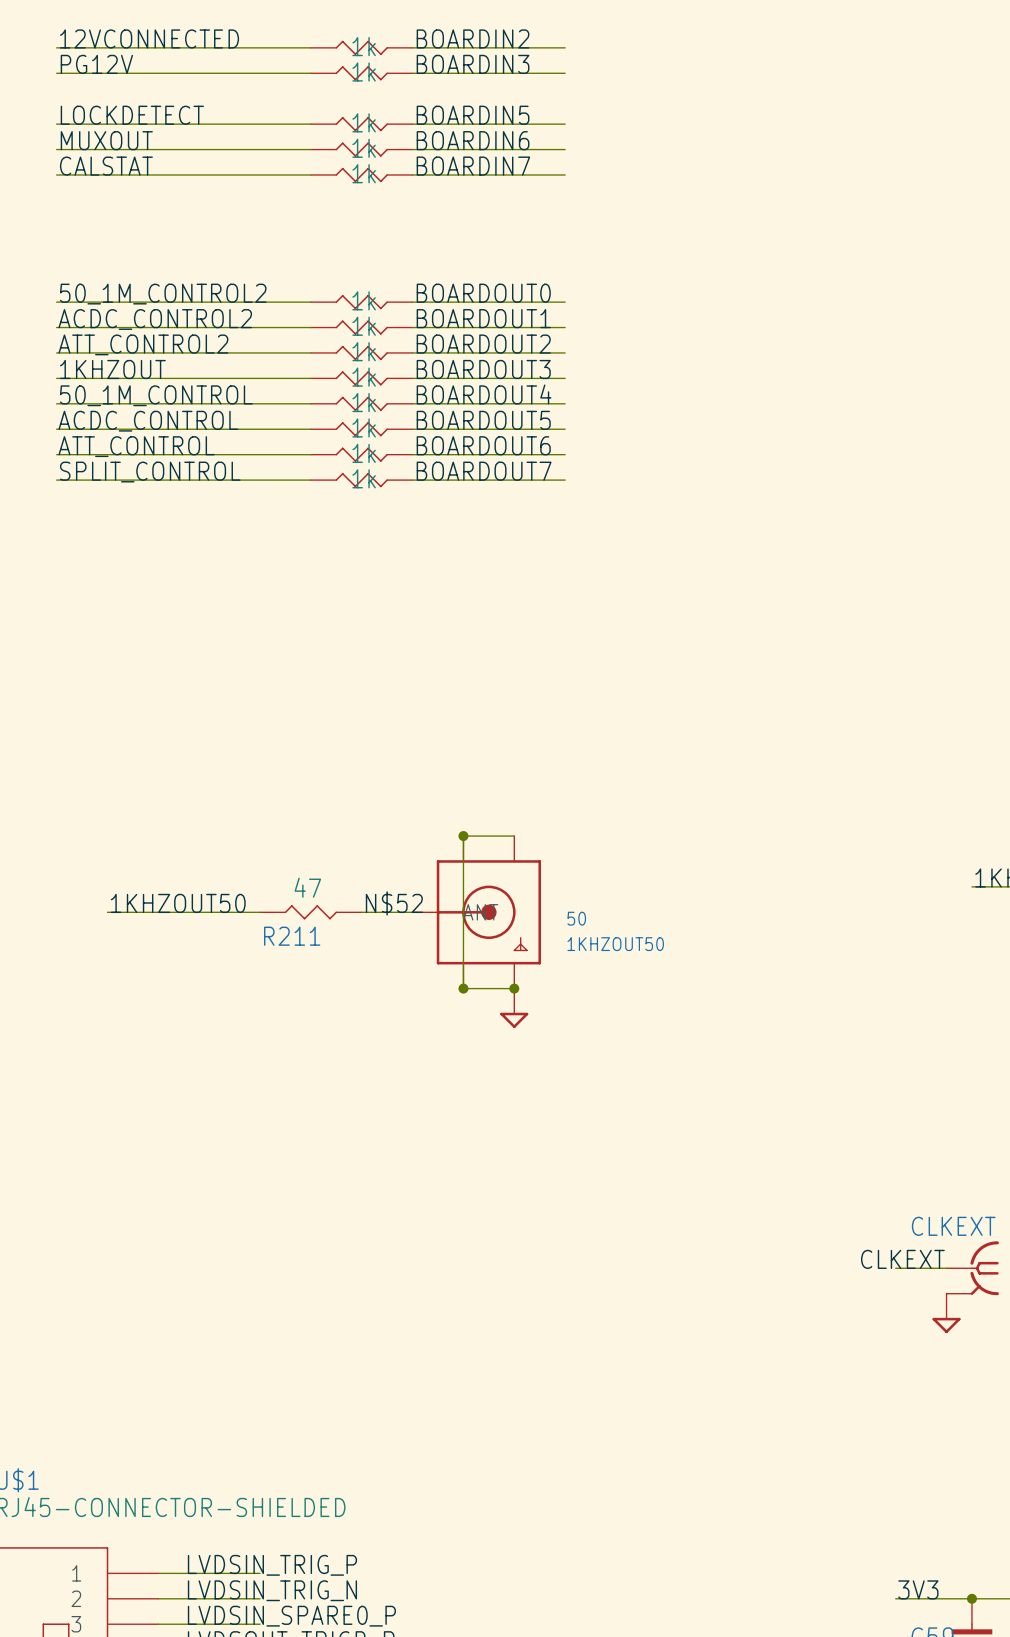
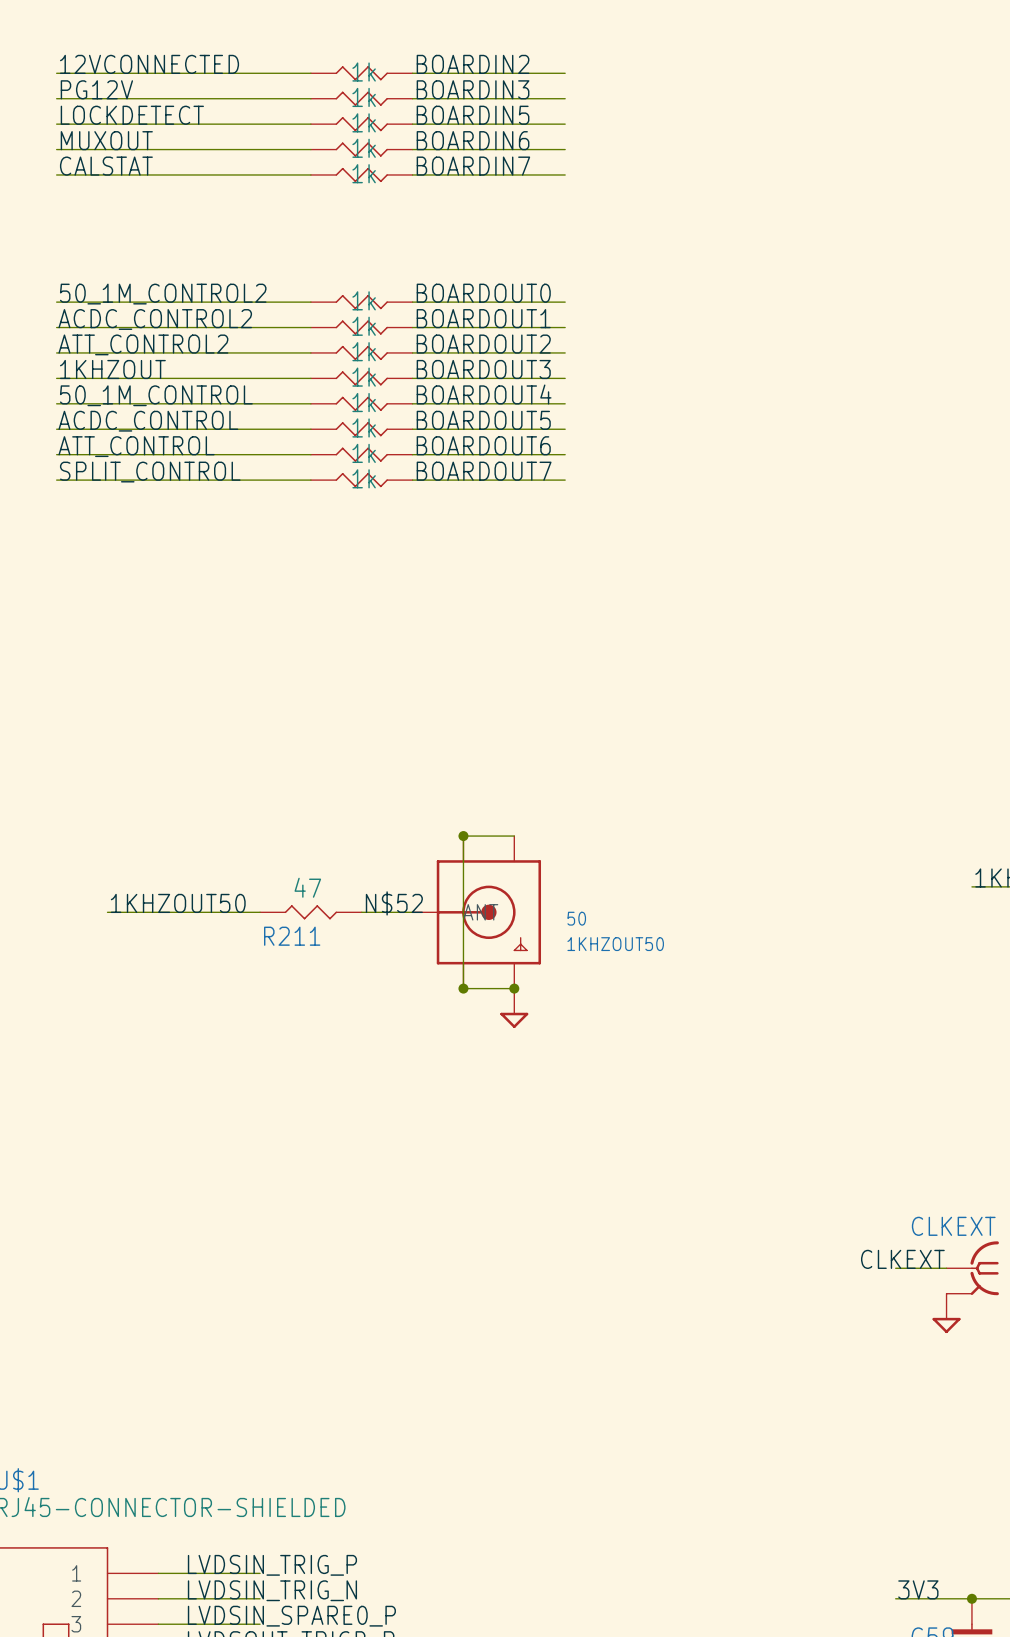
label: 12VCONNECTED (149, 38) -> none
label: BOARDIN2 (473, 38) -> none
wire: (56, 47) (310, 47) -> (56, 98) (310, 98)
part position: (361, 47) -> (361, 98)
wire: (412, 47) (565, 47) -> (412, 98) (565, 98)
label: PG12V (96, 64) -> 12VCONNECTED (149, 64)
label: BOARDIN3 (473, 64) -> BOARDIN2 (473, 64)
label: none -> PG12V (96, 89)
label: none -> BOARDIN3 (473, 89)

